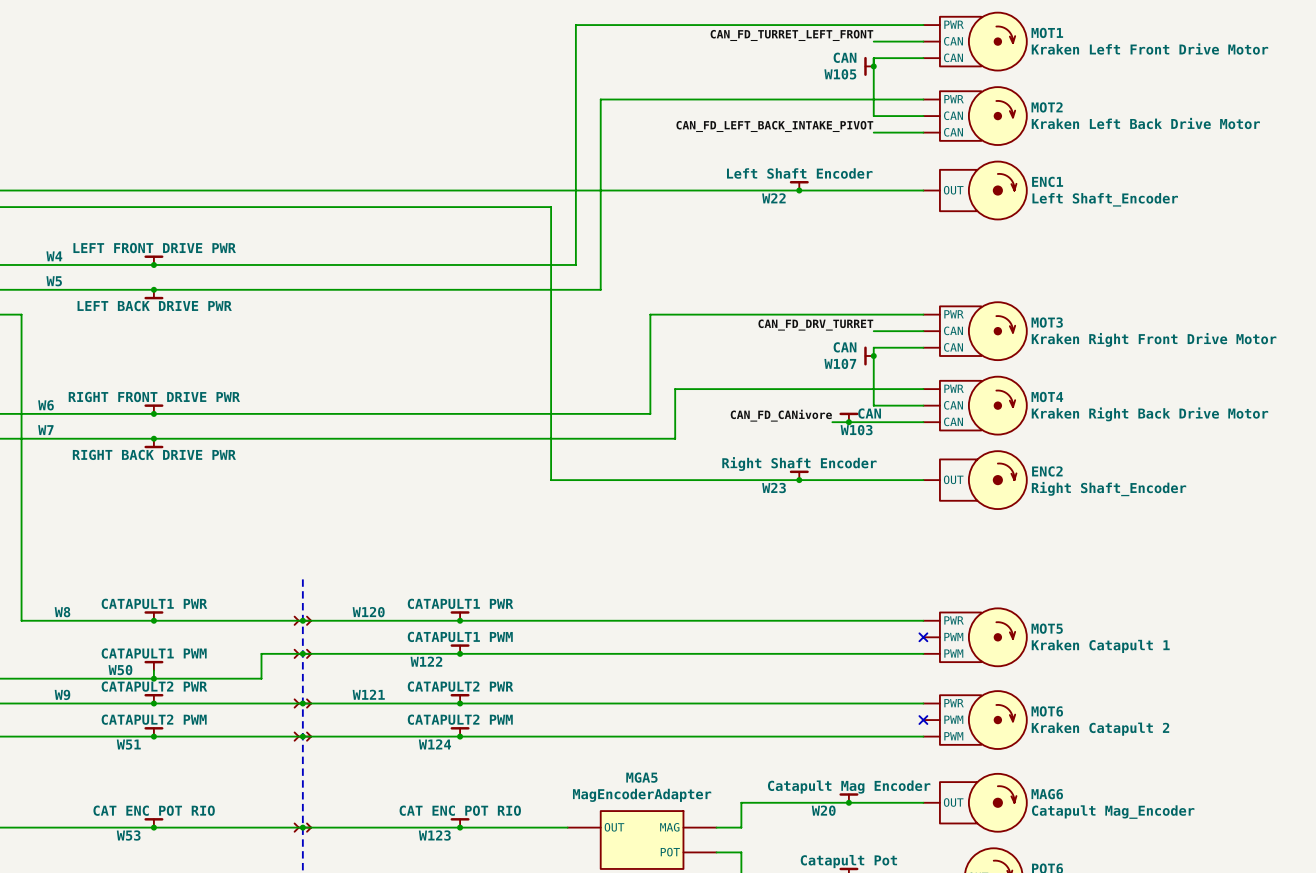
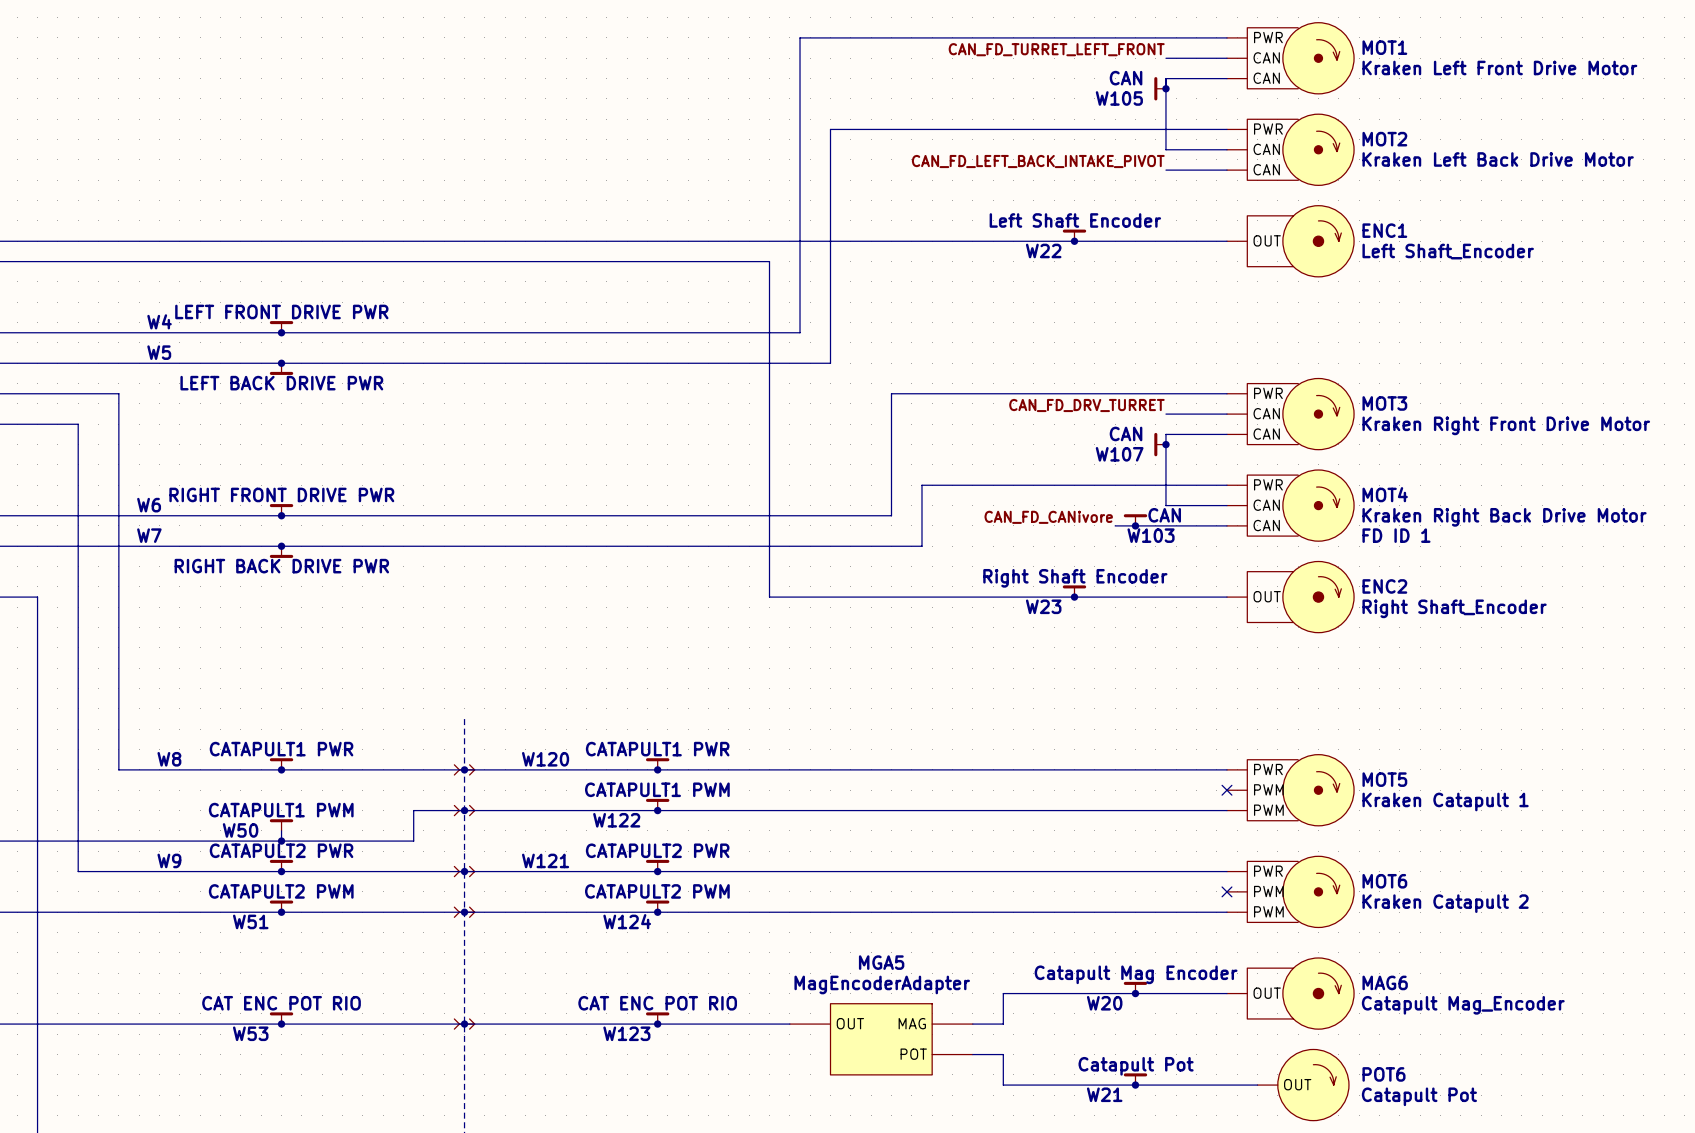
MOT4 text: none -> FD ID 1 (1396, 535)

